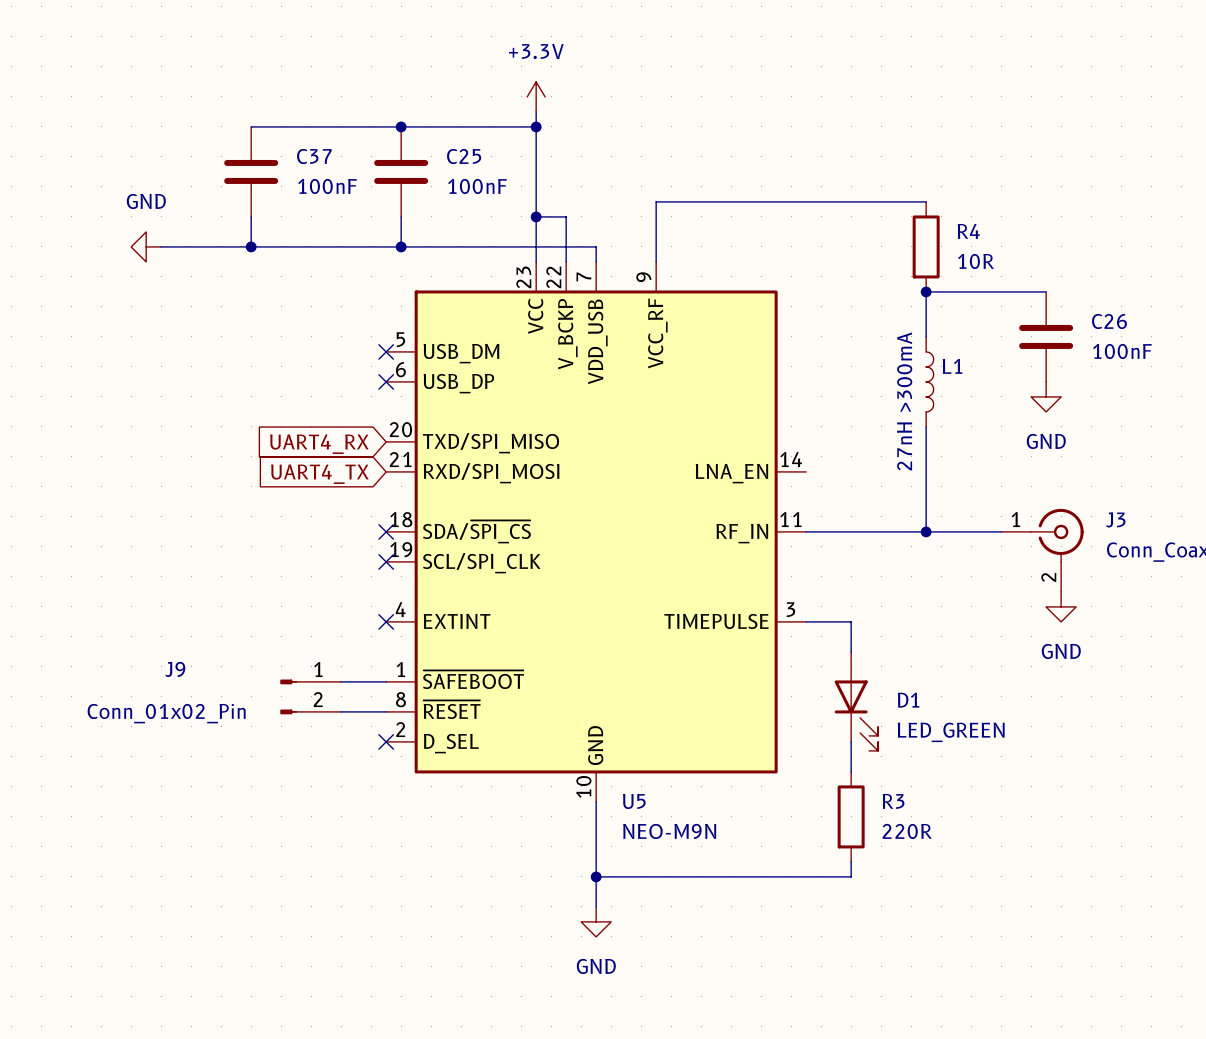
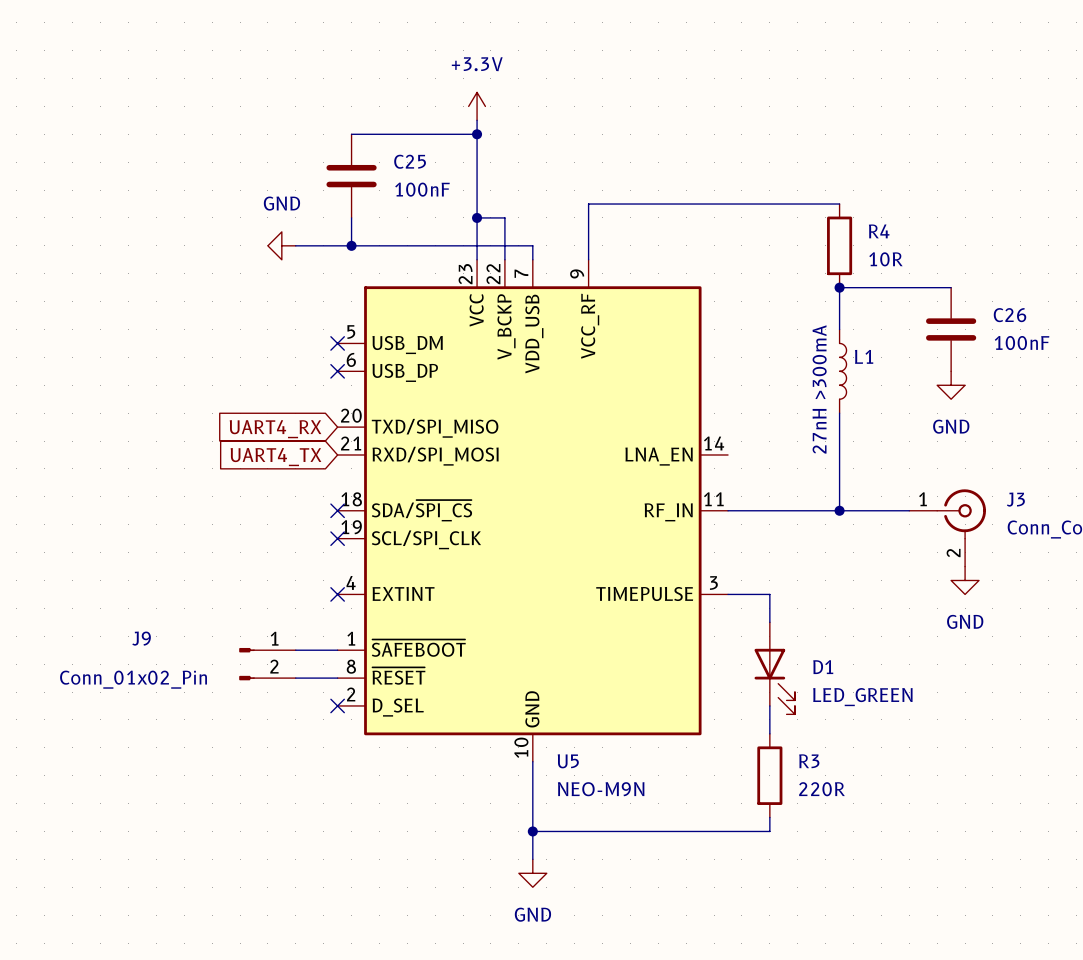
wire: (251, 126) (401, 126) -> none
junction: (401, 126) -> none
C37: 100nF (251, 171) -> none
wire: (251, 216) (251, 246) -> none
power symbol position: GND (146, 246) -> GND (281, 245)
wire: (161, 246) (341, 246) -> none
junction: (251, 246) -> none

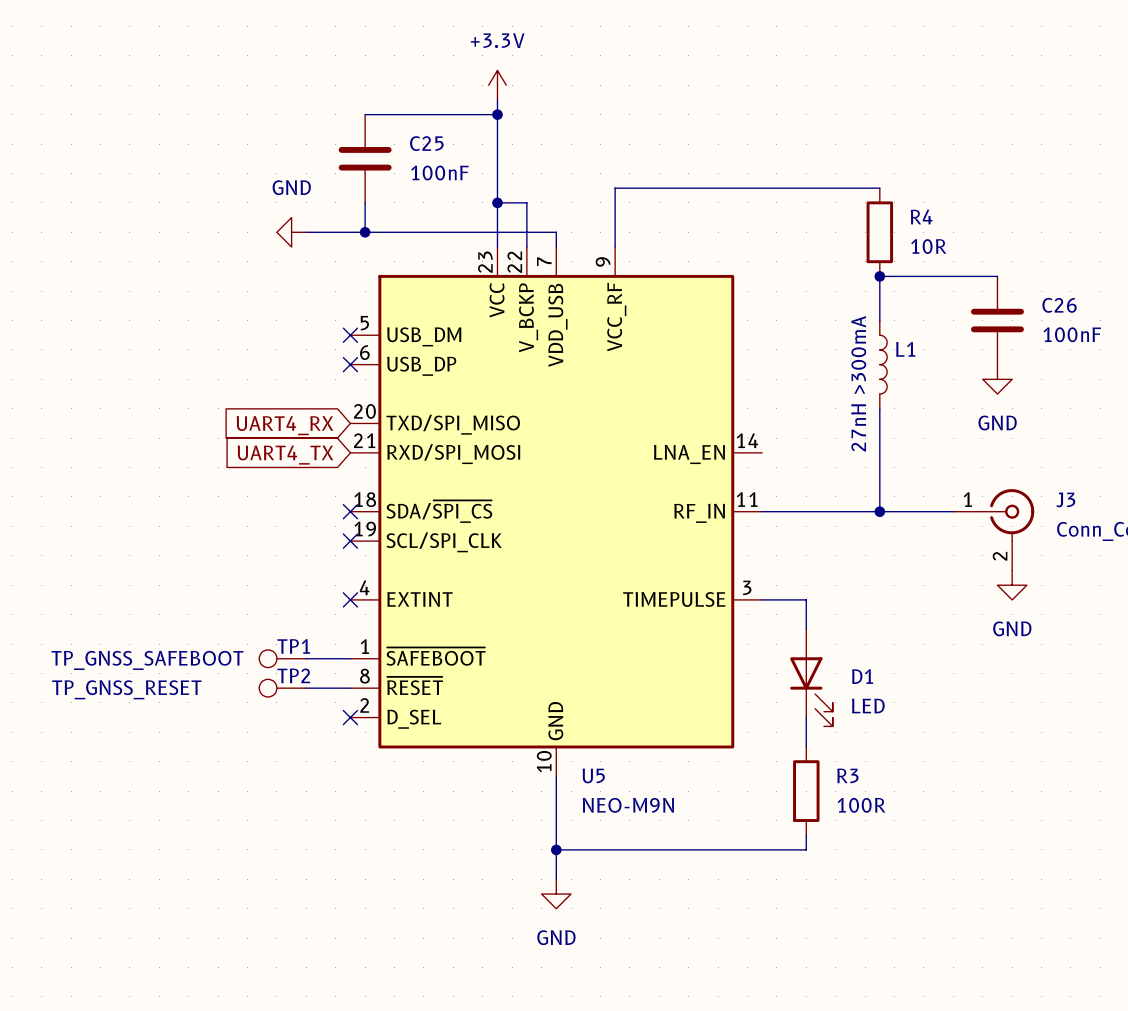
TP1: none -> TP_GNSS_SAFEBOOT (282, 658)
J9: Conn_01x02_Pin (267, 664) -> none
TP2: none -> TP_GNSS_RESET (282, 688)
D1 value: LED_GREEN (862, 697) -> LED (868, 705)
R3 value: 220R (821, 789) -> 100R (861, 805)

